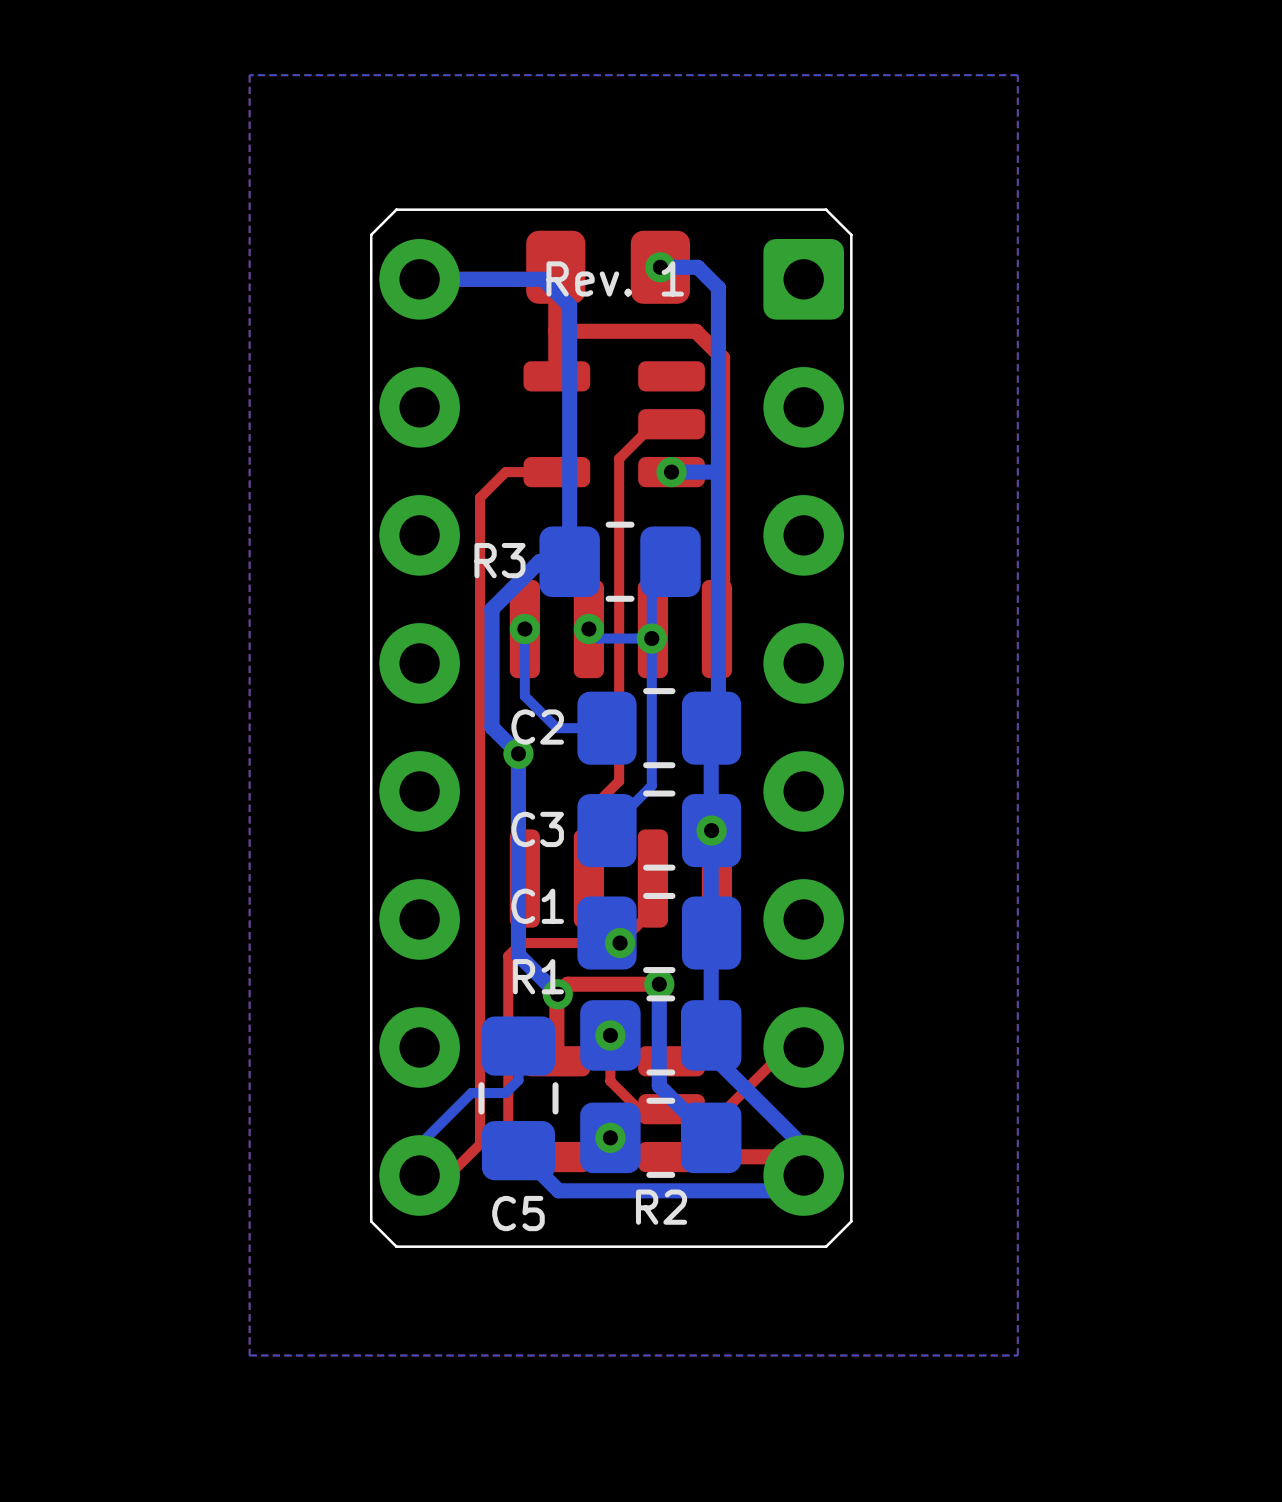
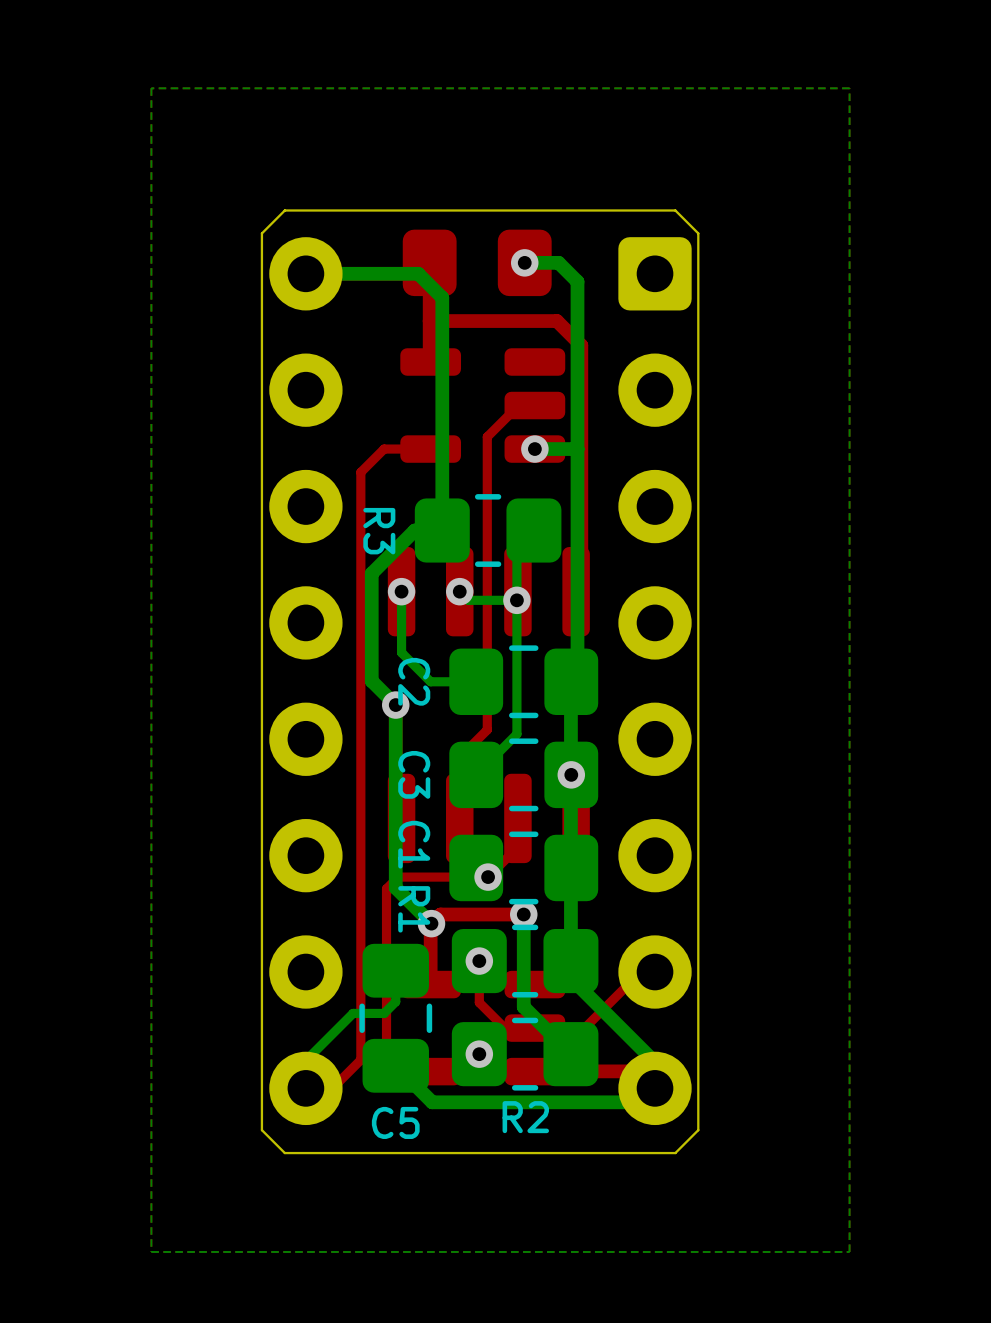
text: Rev. 1 (615, 278) -> none
R3 name rotation: 0° (499, 560) -> 90° clockwise (379, 531)
C2 name rotation: 0° (537, 727) -> 90° clockwise (414, 681)
C3 name rotation: 0° (537, 829) -> 90° clockwise (414, 774)
C1 name rotation: 0° (537, 906) -> 90° clockwise (414, 844)
R1 name rotation: 0° (538, 976) -> 90° clockwise (414, 909)

